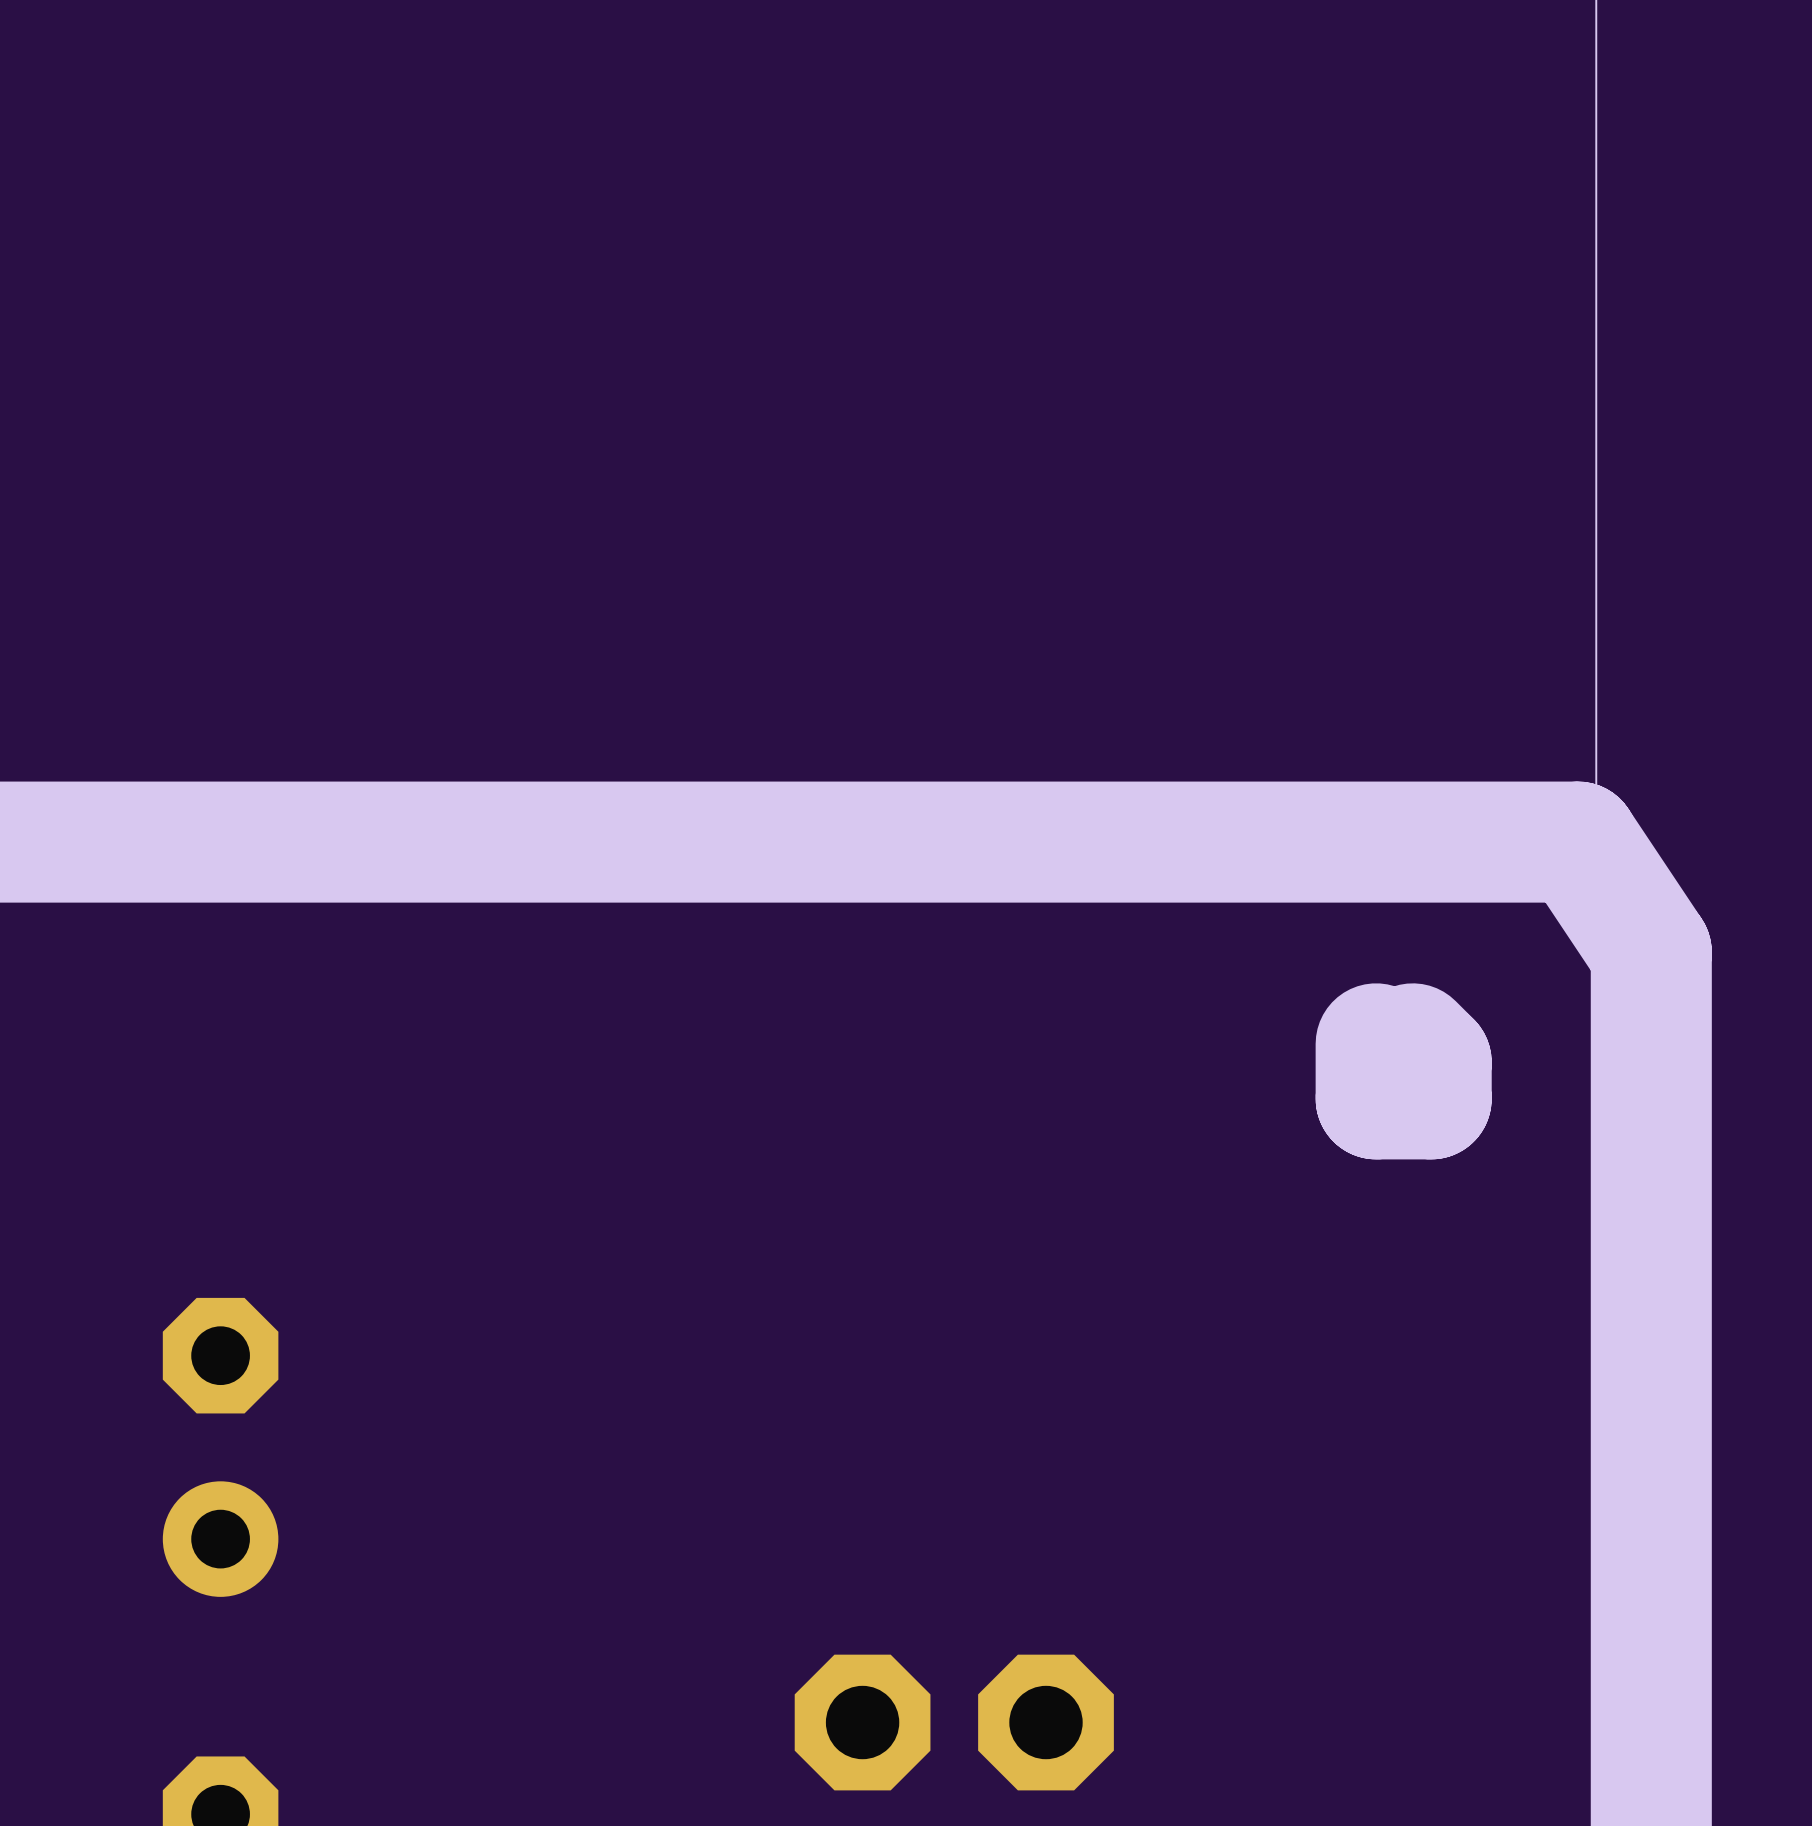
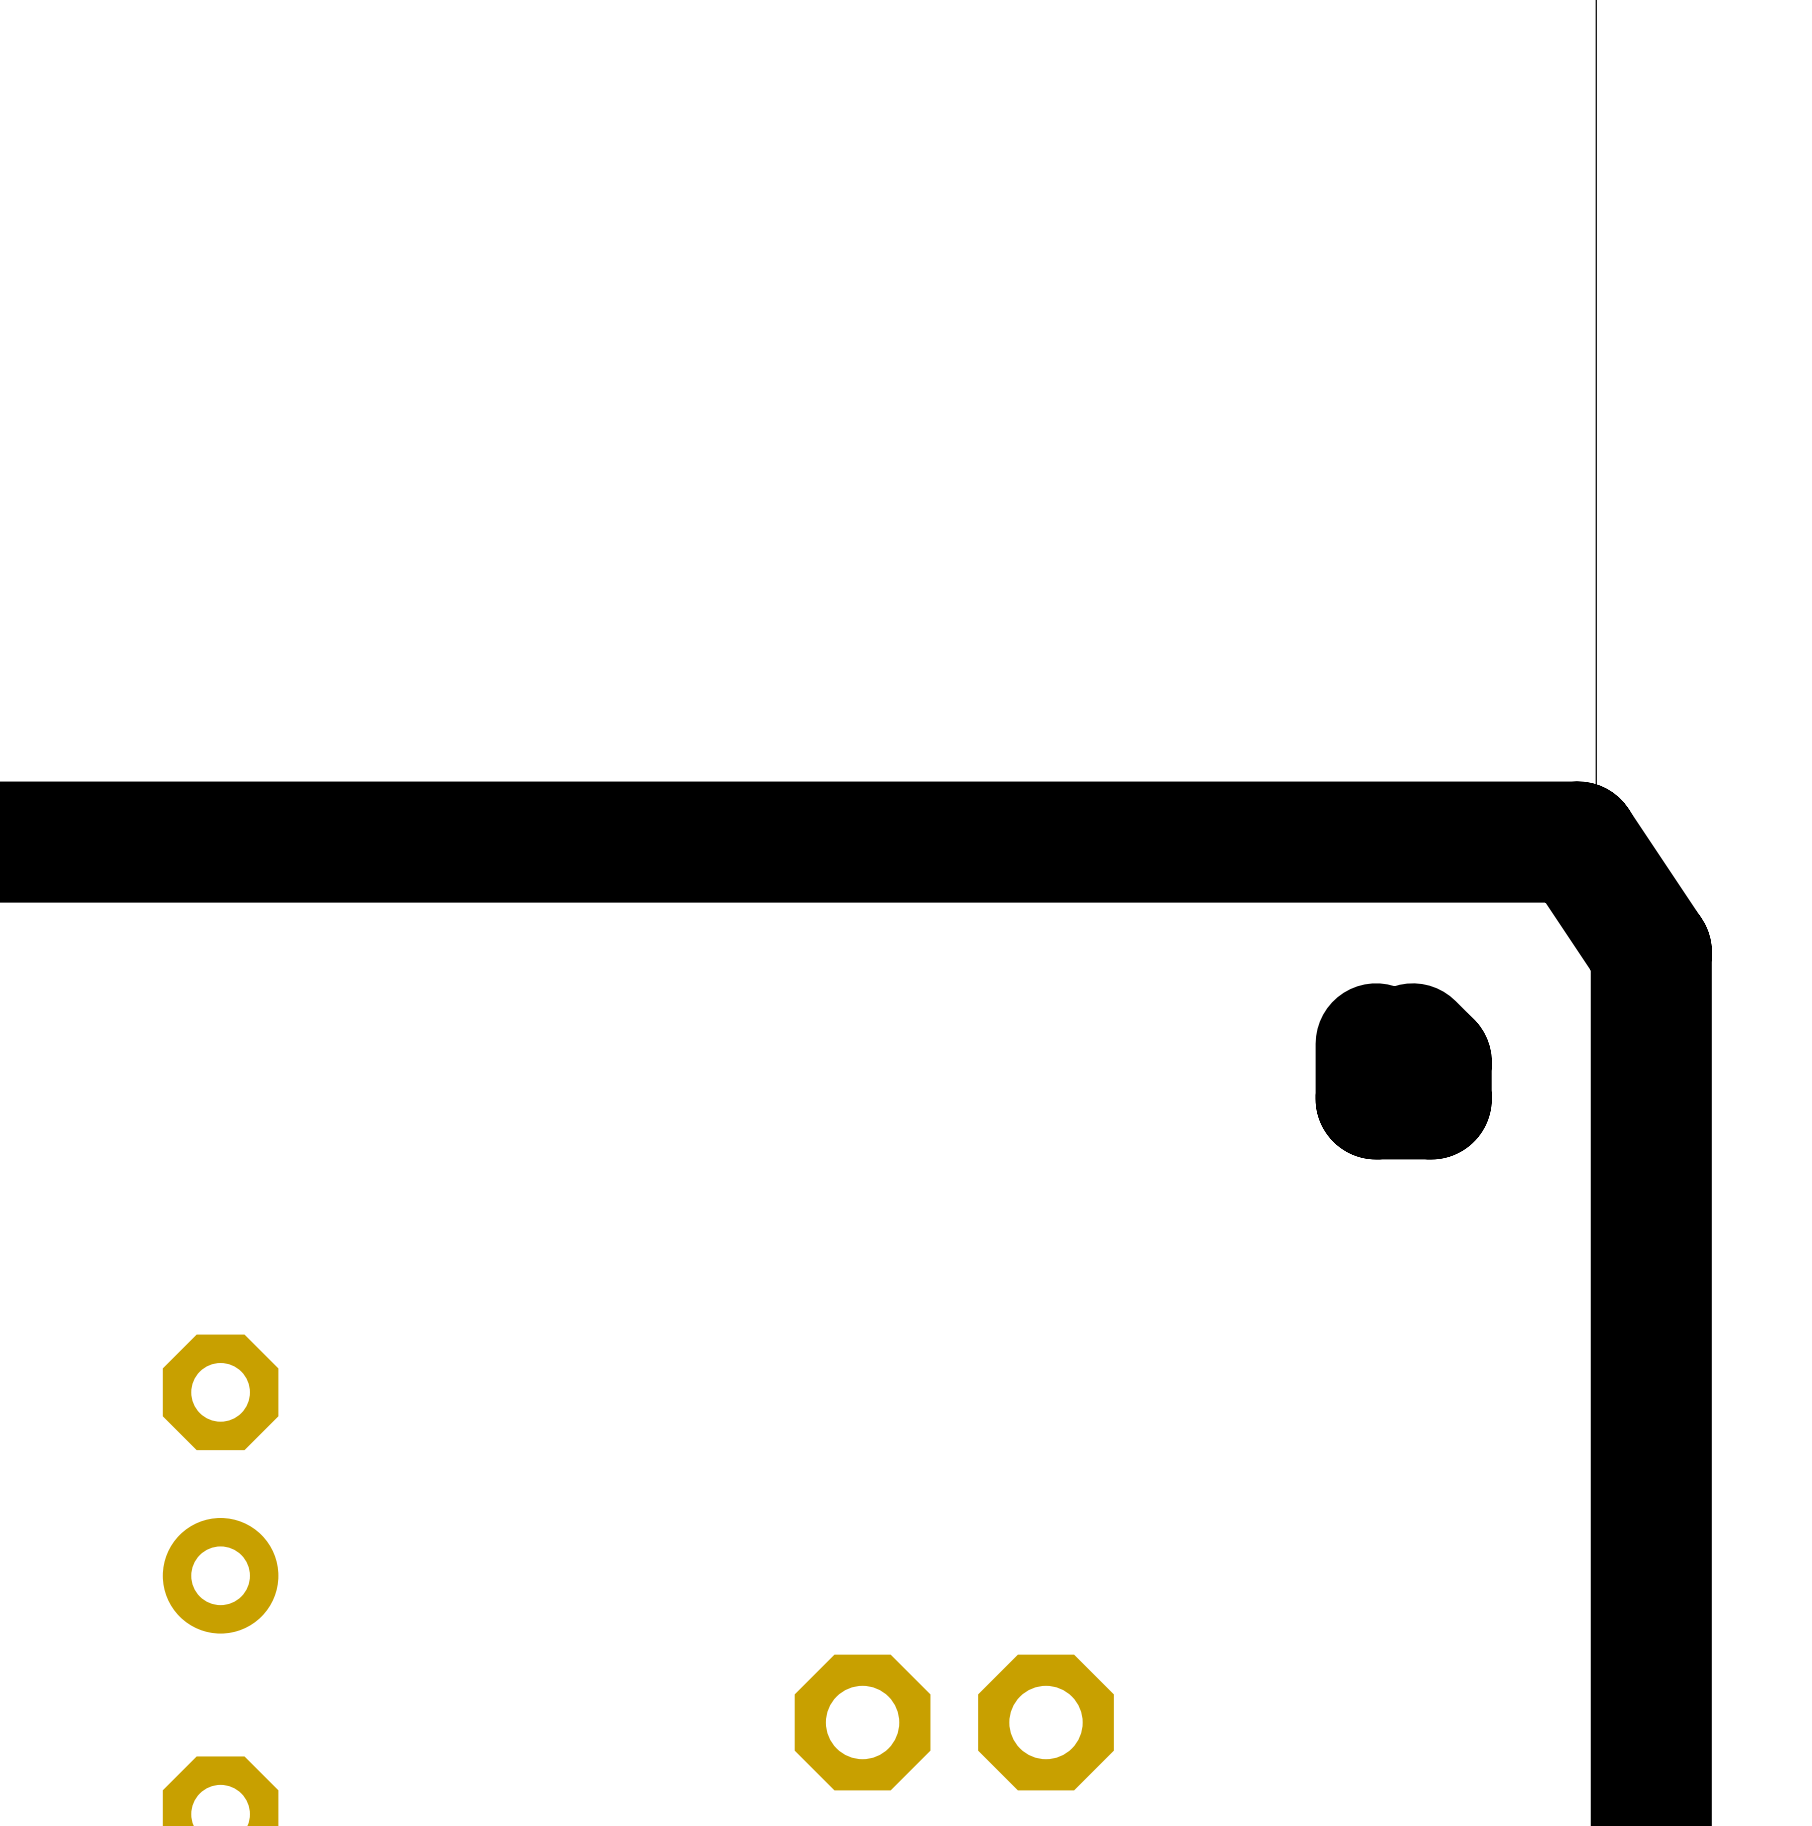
part position: (220, 1447) -> (220, 1484)

